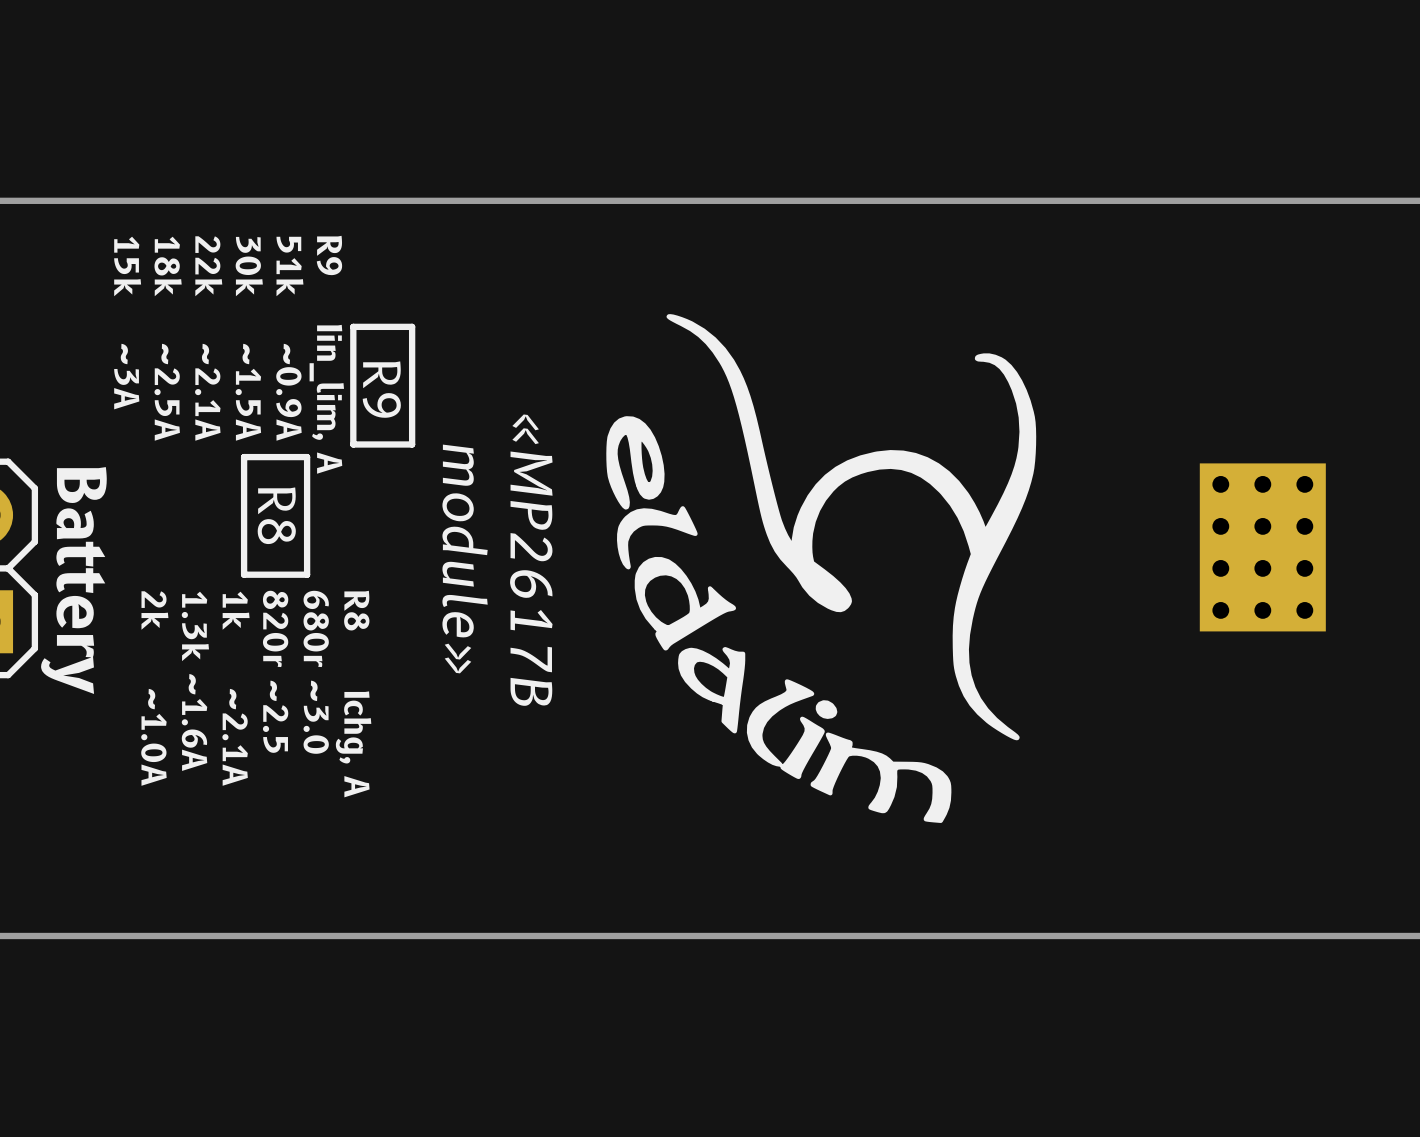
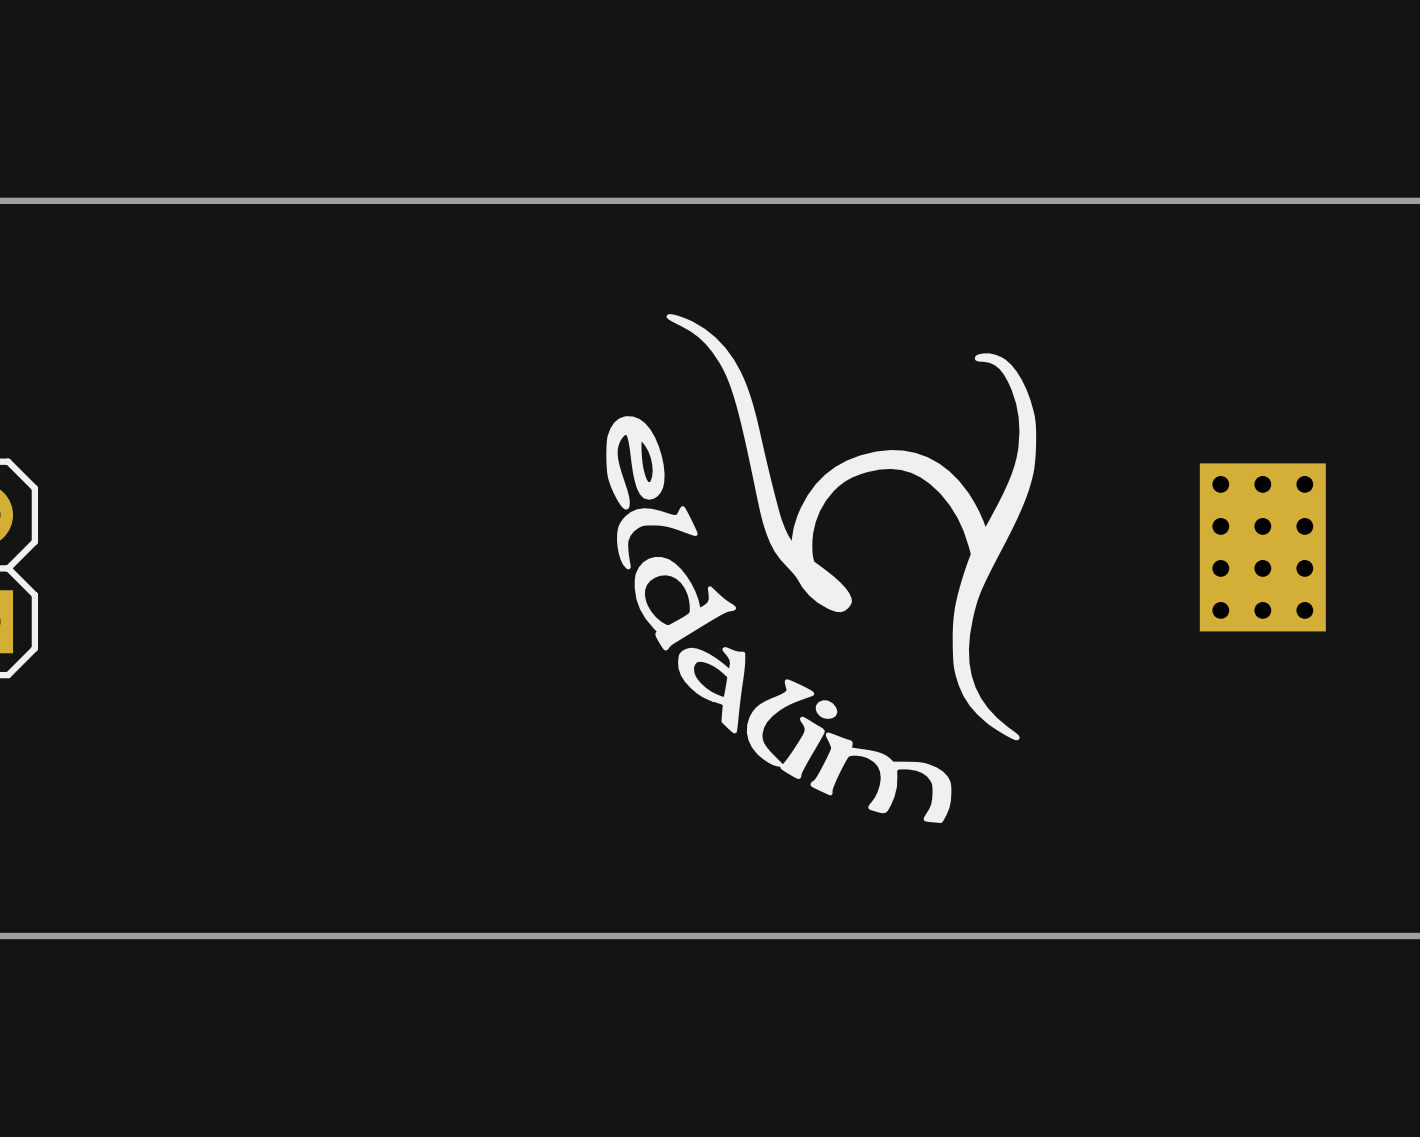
text: 15k ~3A (127, 323) -> none
line: (412, 326) (353, 326) (353, 444) (412, 444) (412, 326) -> none
text: 18k ~2.5A (168, 338) -> none
text: 22k ~2.1A (208, 338) -> none
text: 30k ~1.5A (249, 338) -> none
text: 51k ~0.9A (289, 338) -> none
text: R9 Iin_lim, A (326, 354) -> none
text: R9 (381, 389) -> none
line: (307, 457) (244, 457) (244, 574) (307, 574) (307, 457) -> none
text: R8 (276, 515) -> none
text: module» (465, 558) -> none
text: «MP2617B (531, 560) -> none
text: Battery (73, 580) -> none
text: 820r ~2.5 (275, 671) -> none
text: 680r ~3.0 (316, 672) -> none
text: 1.3k ~1.6A (195, 681) -> none
text: 2k ~1.0A (154, 688) -> none
text: 1k ~2.1A (235, 688) -> none
text: R8 Ichg, A (353, 694) -> none

